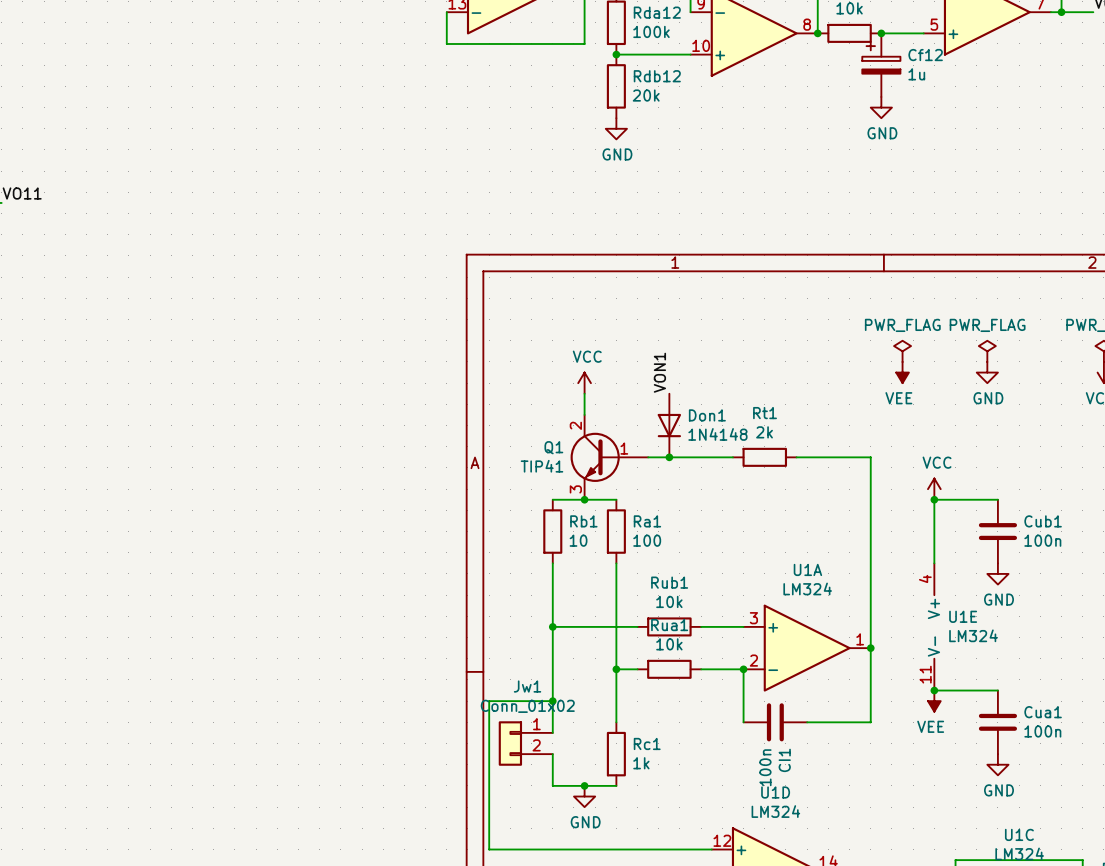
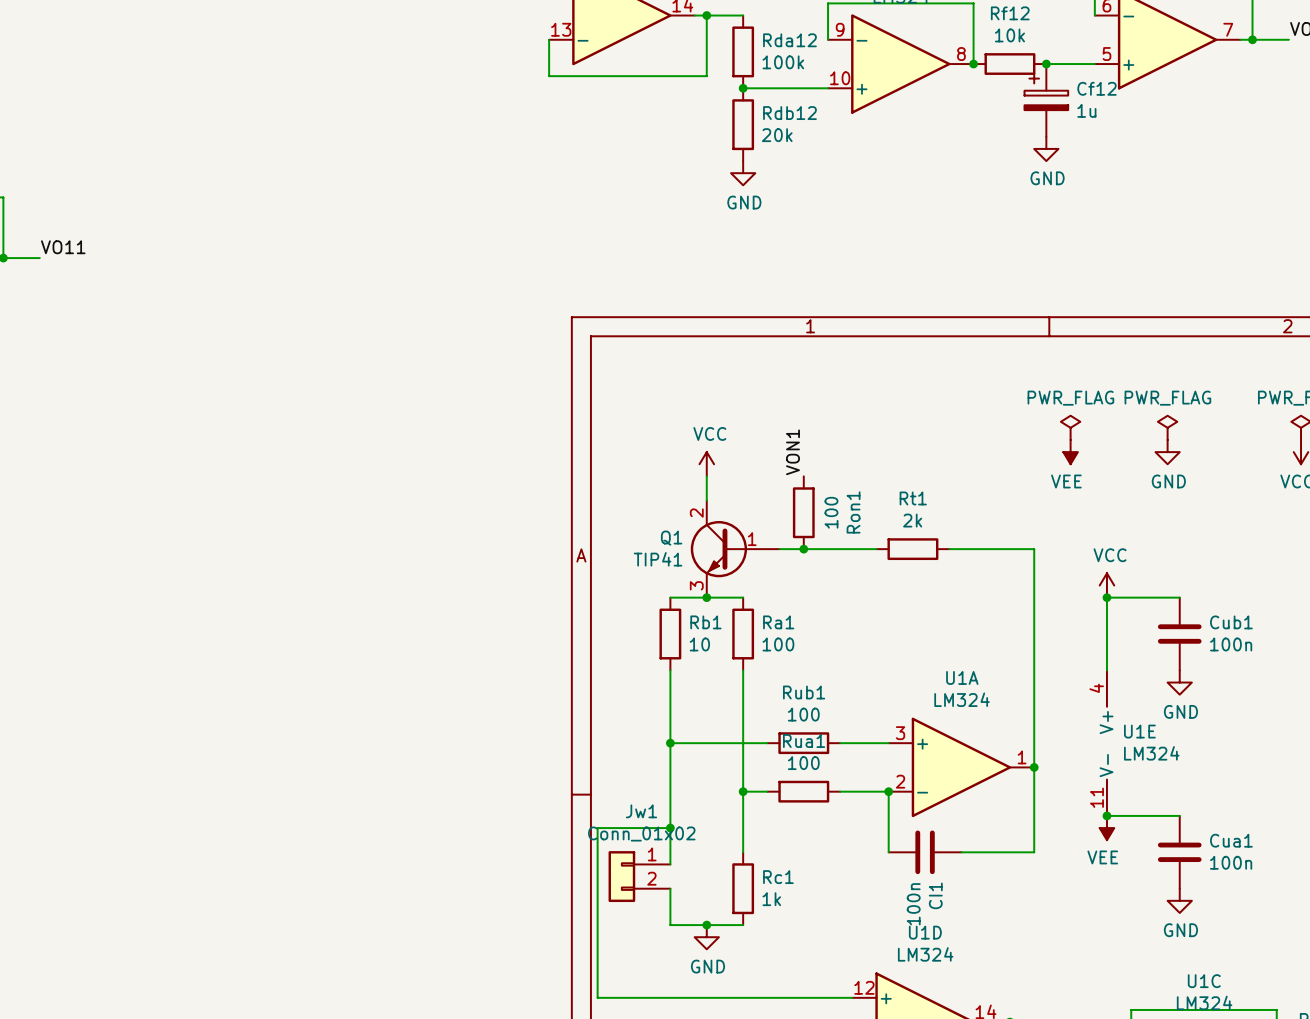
Don1: 1N4148 (669, 425) -> none
Ron1: none -> 100 (803, 512)
Rub1 value: 10k (669, 601) -> 100 (803, 714)
Rua1 value: 10k (669, 644) -> 100 (803, 763)

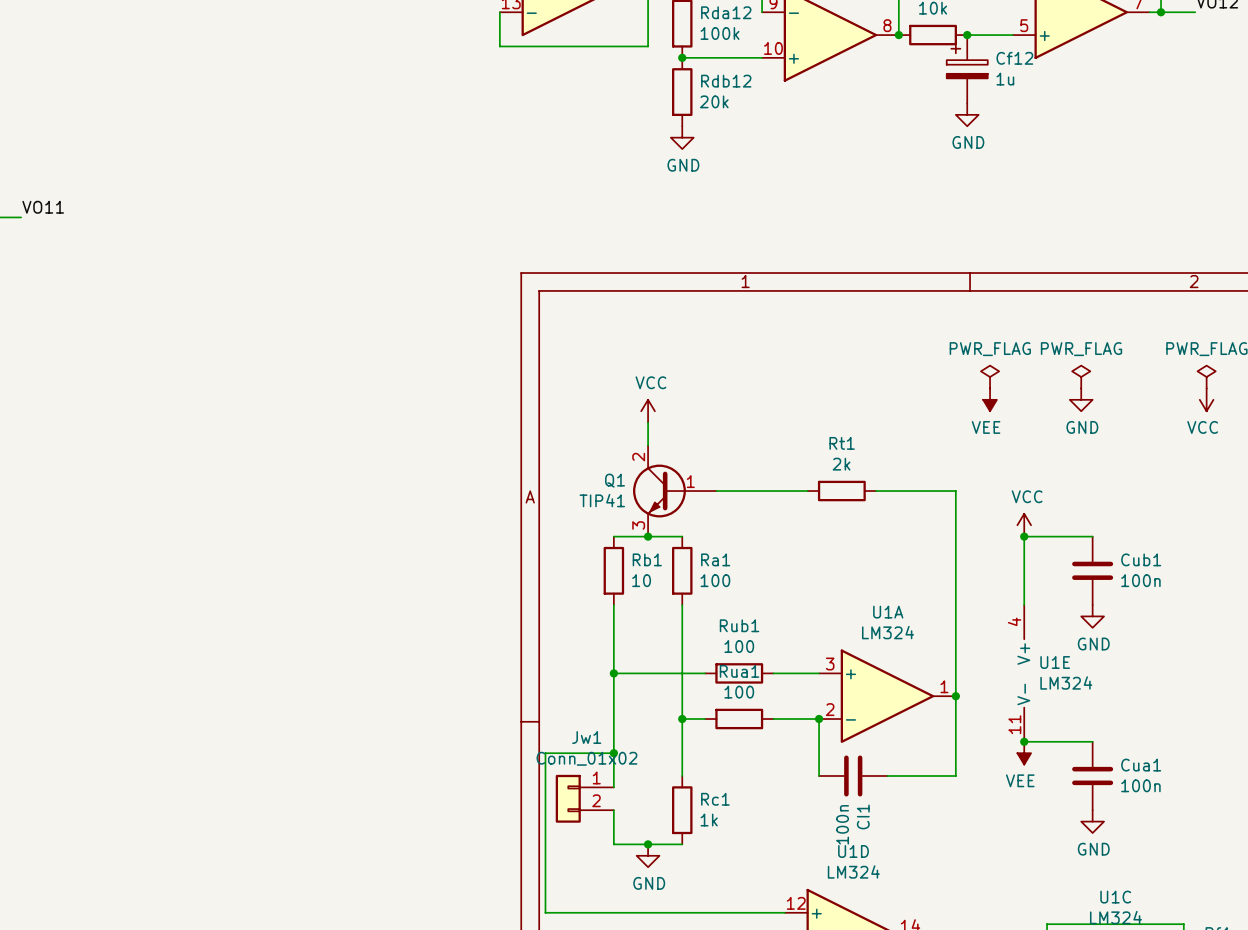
label: VON1 (792, 452) -> none
Ron1: 100 (803, 512) -> none
junction: (803, 549) -> none

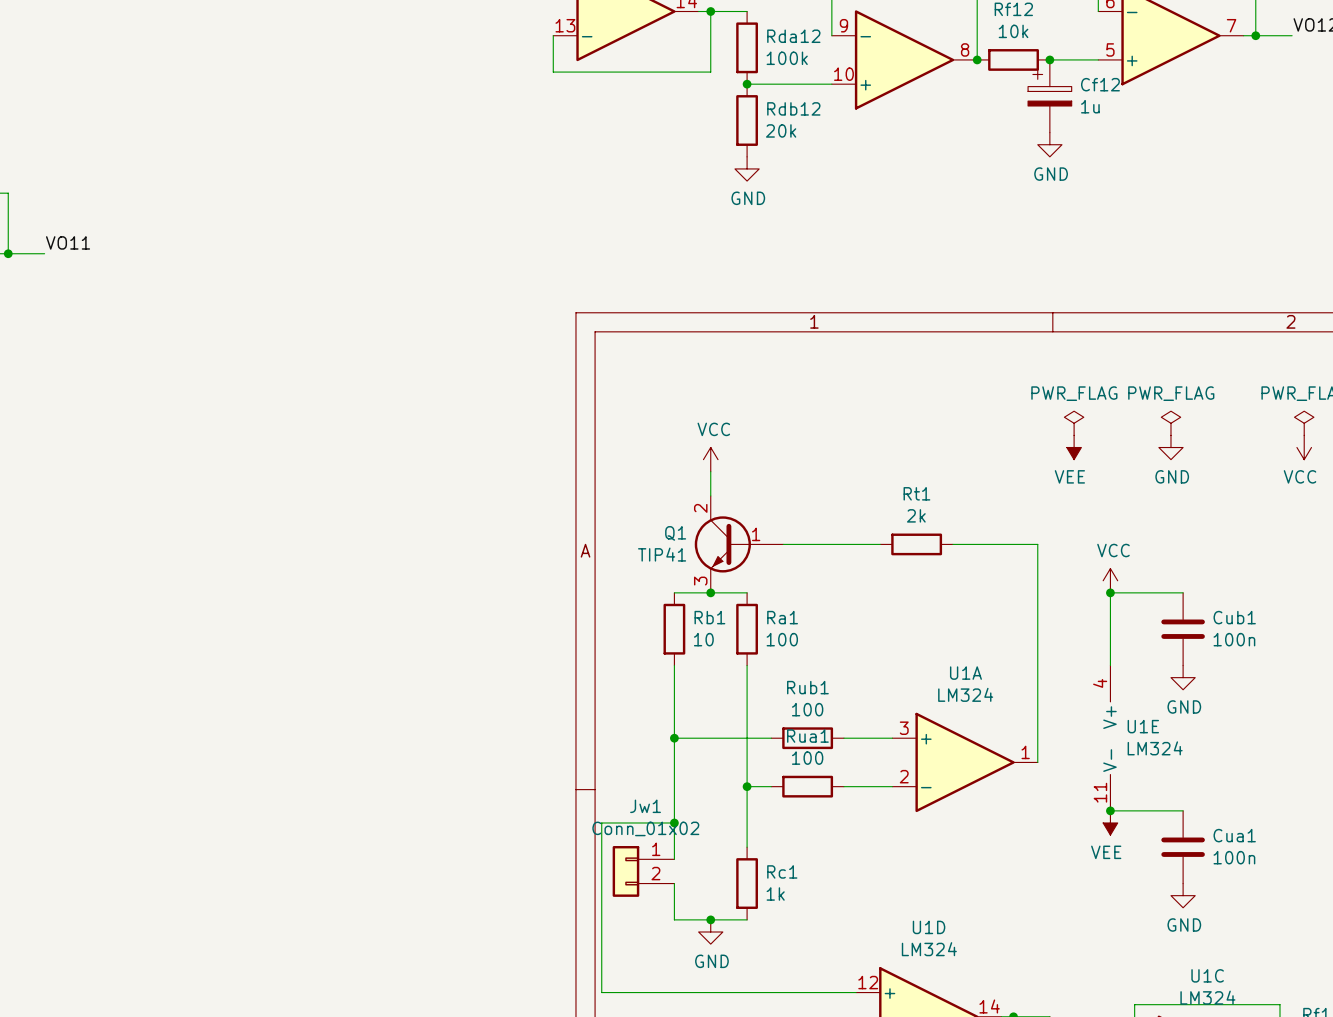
wire: (955, 696) (955, 776) (887, 776) -> none
junction: (955, 696) -> none
wire: (819, 719) (819, 776) -> none
junction: (819, 719) -> none
CI1: 100n (853, 776) -> none

